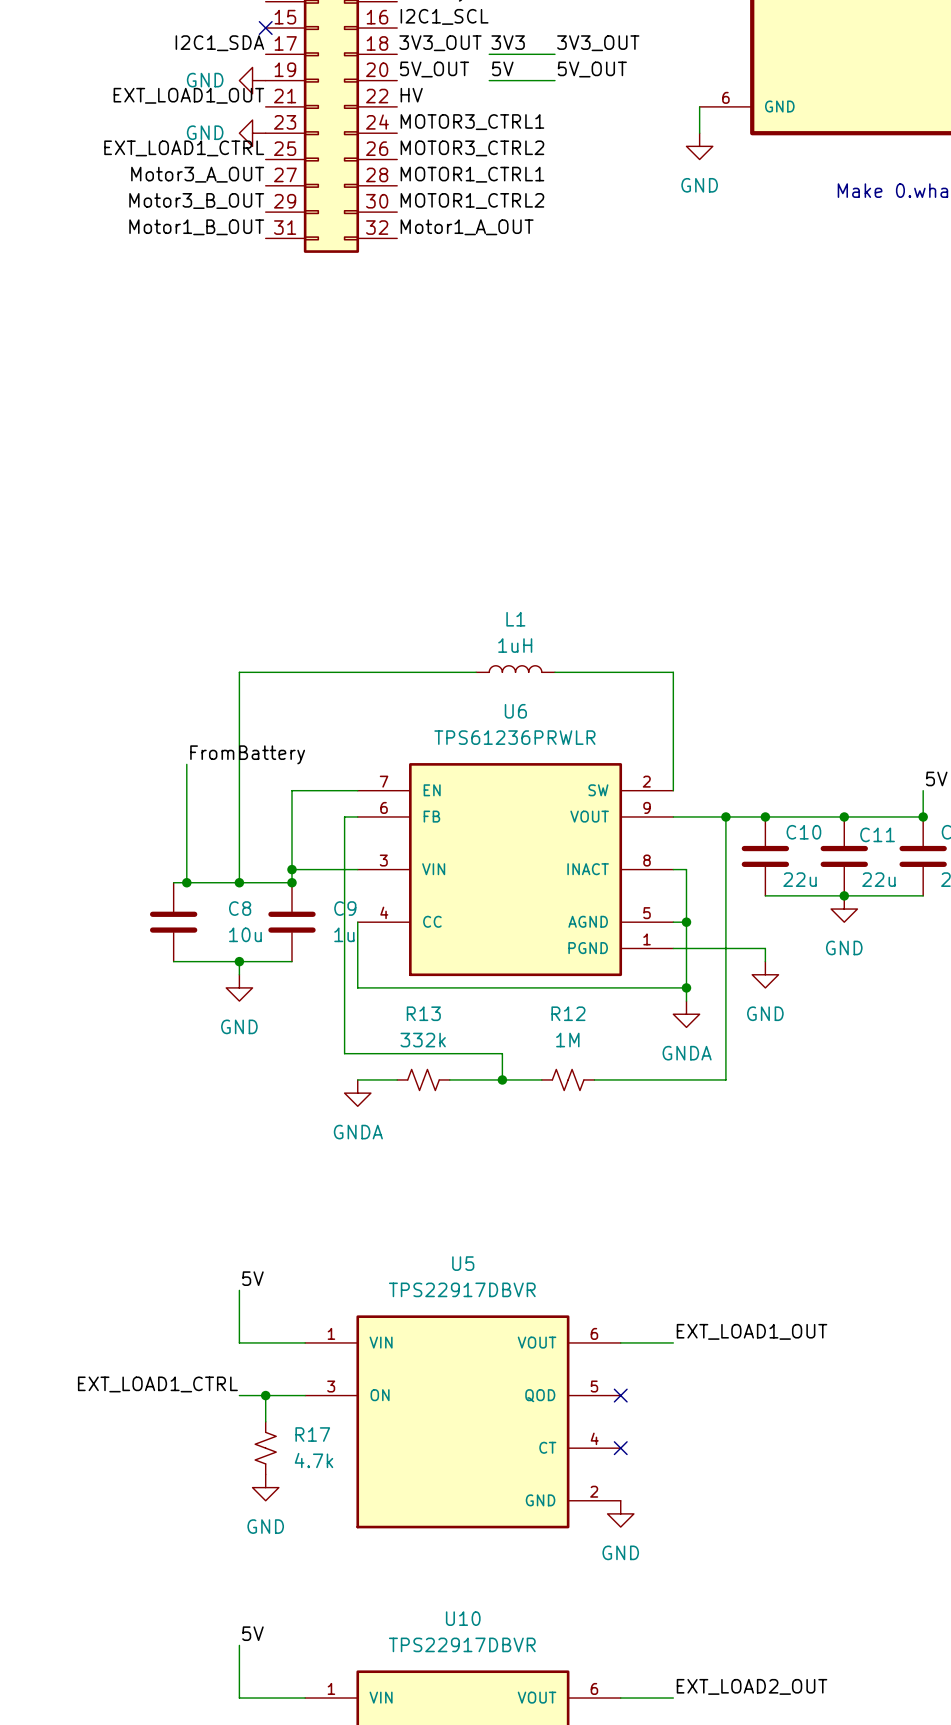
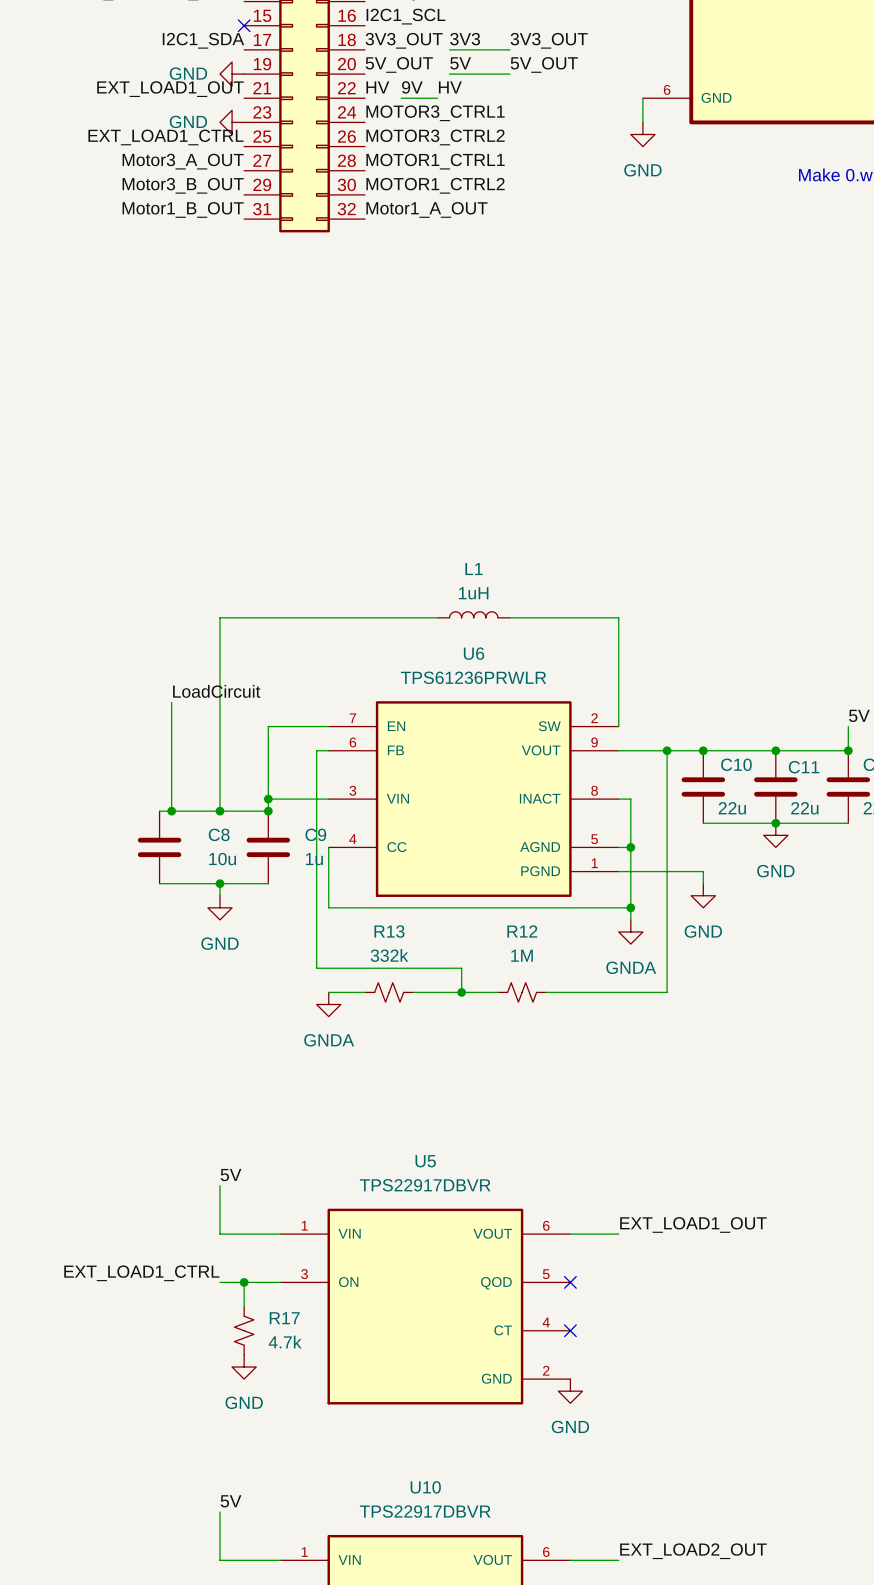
label: none -> 9V (412, 87)
label: none -> HV (450, 87)
wire: none -> (401, 98) (437, 98)
label: FromBattery (247, 754) -> LoadCircuit (216, 691)

